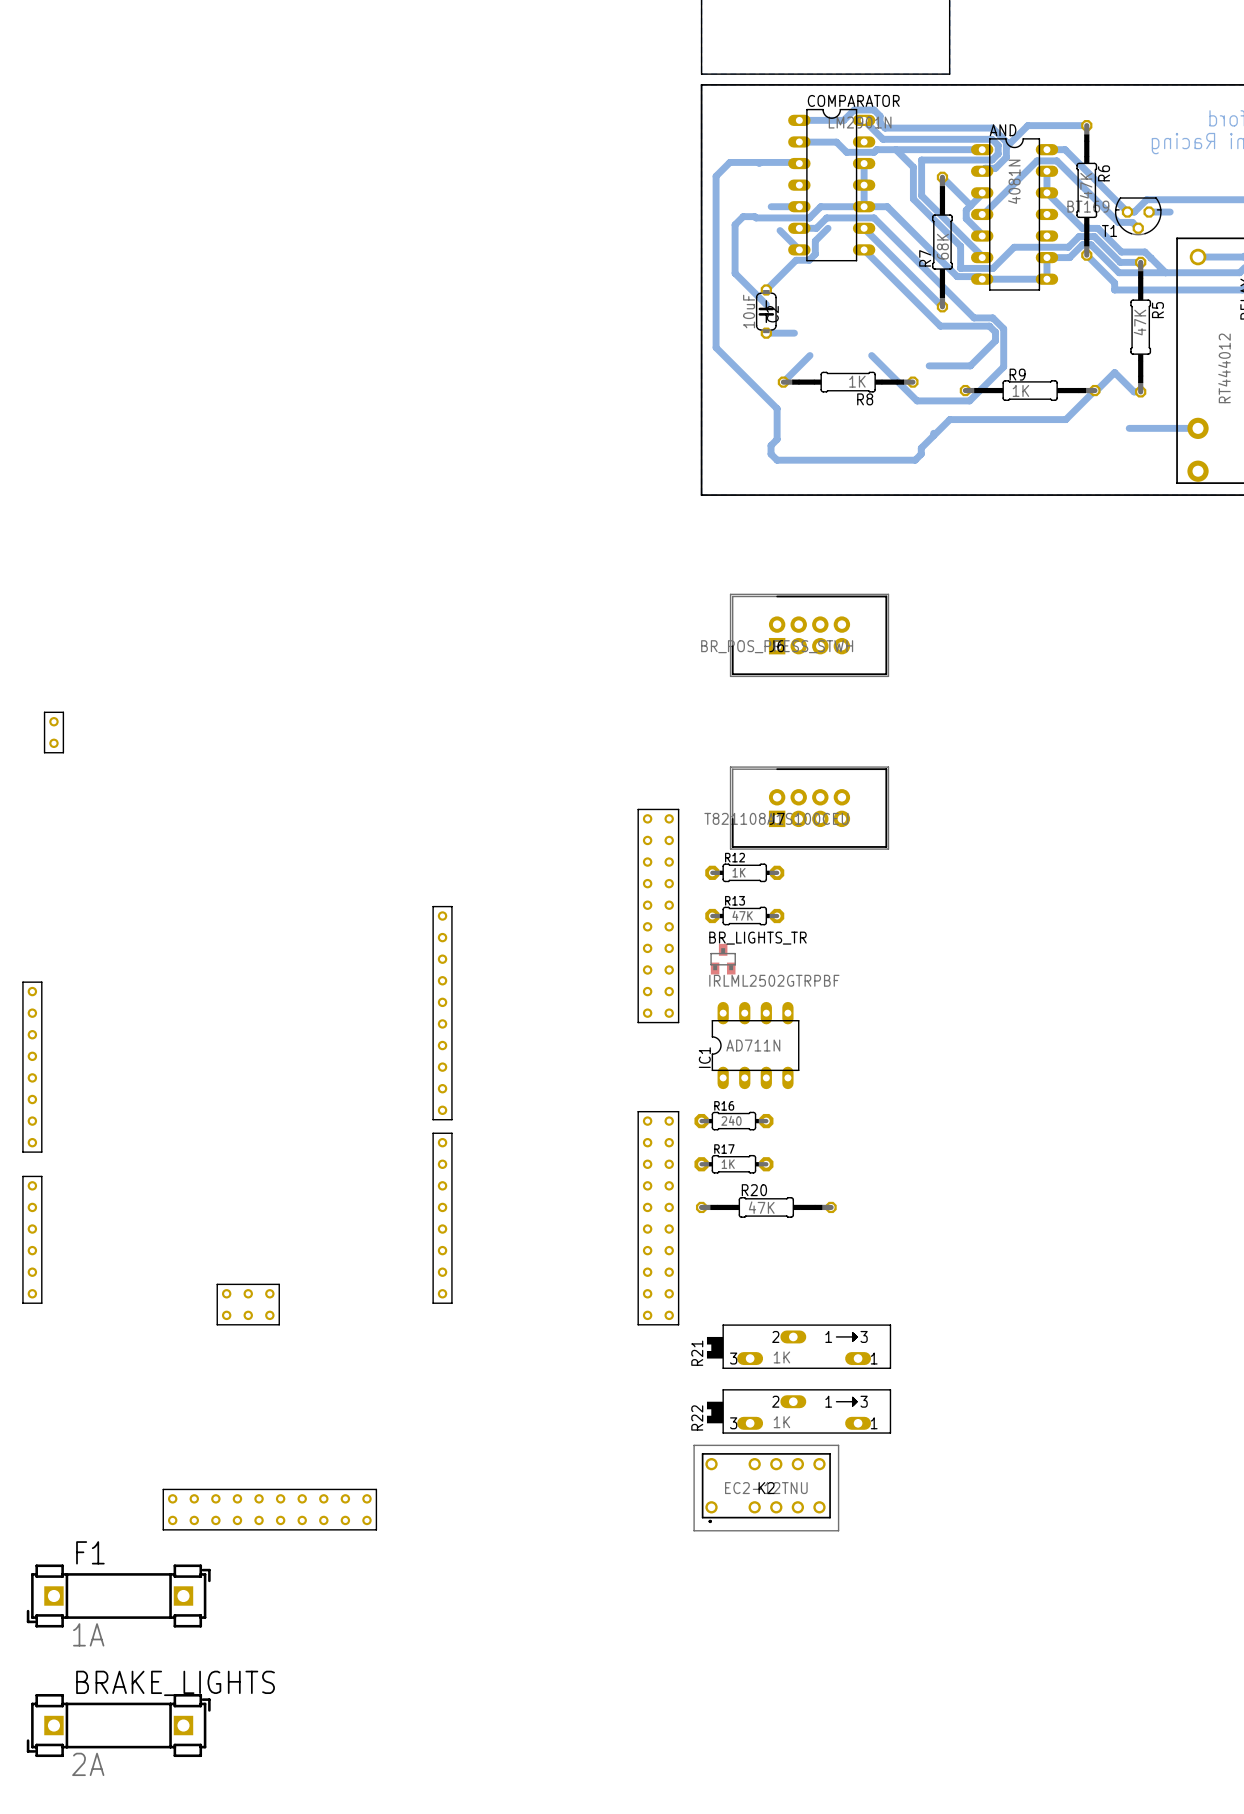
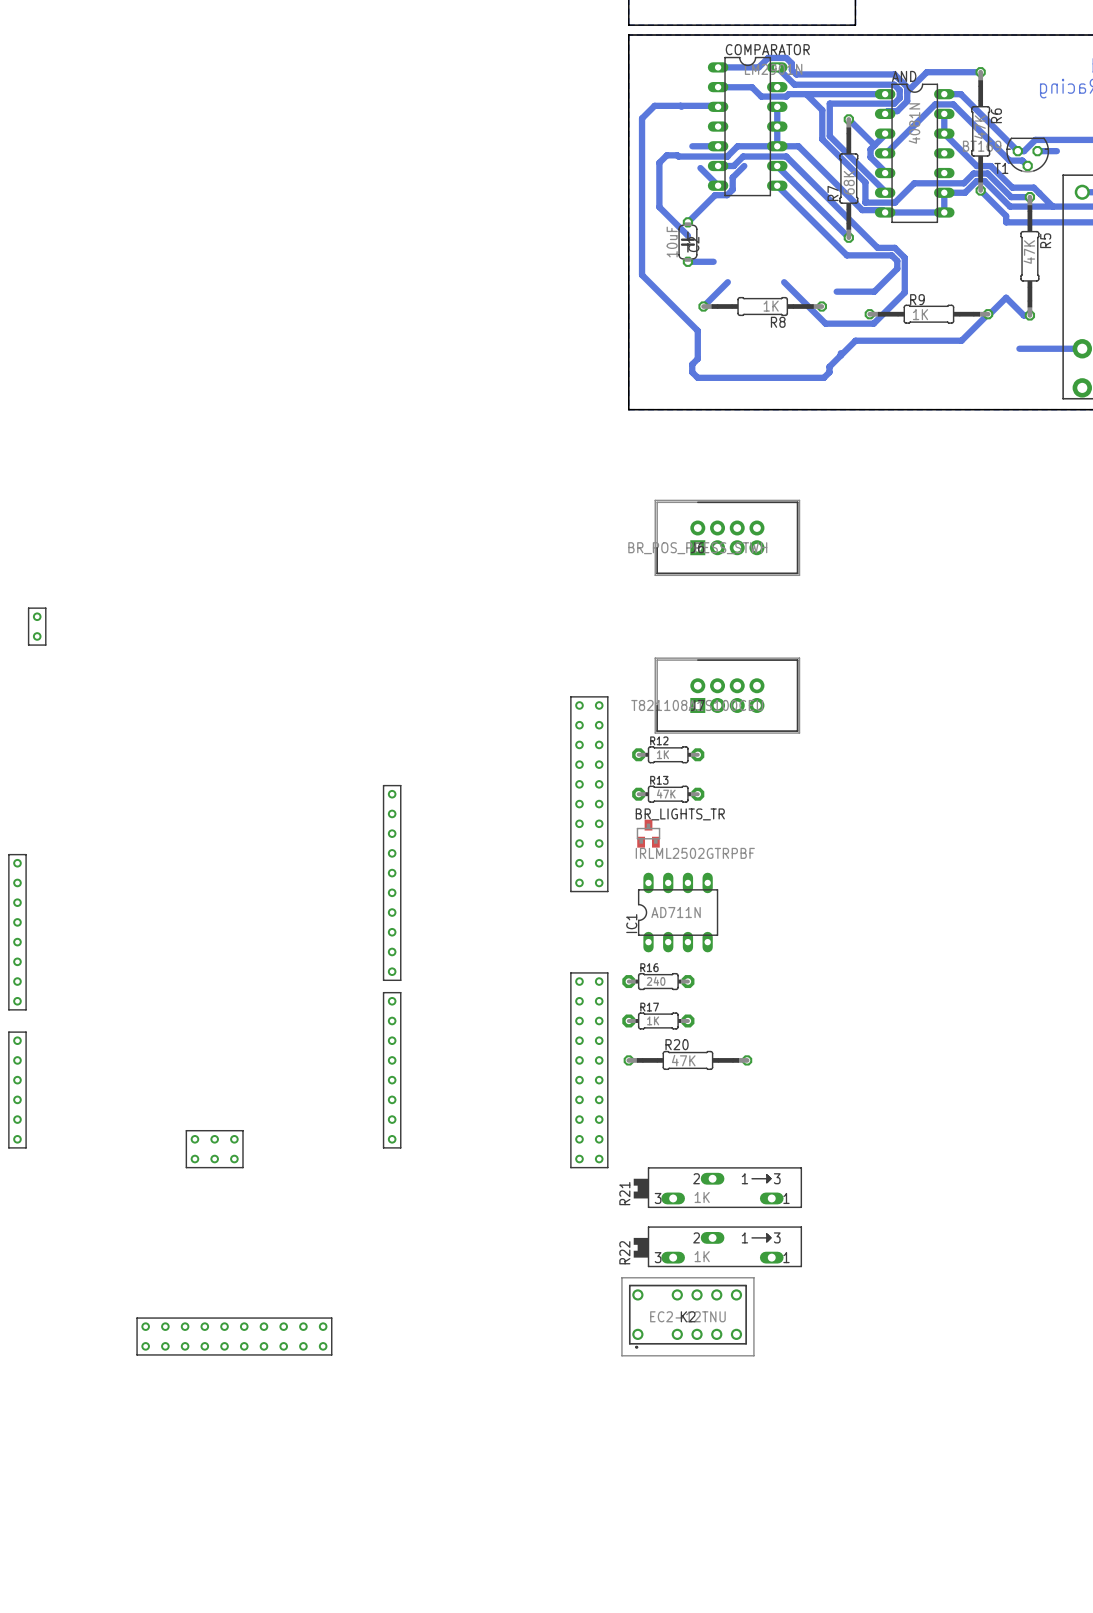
F1: 1A (118, 1596) -> none
BRAKE_LIGHTS: 2A (118, 1725) -> none

